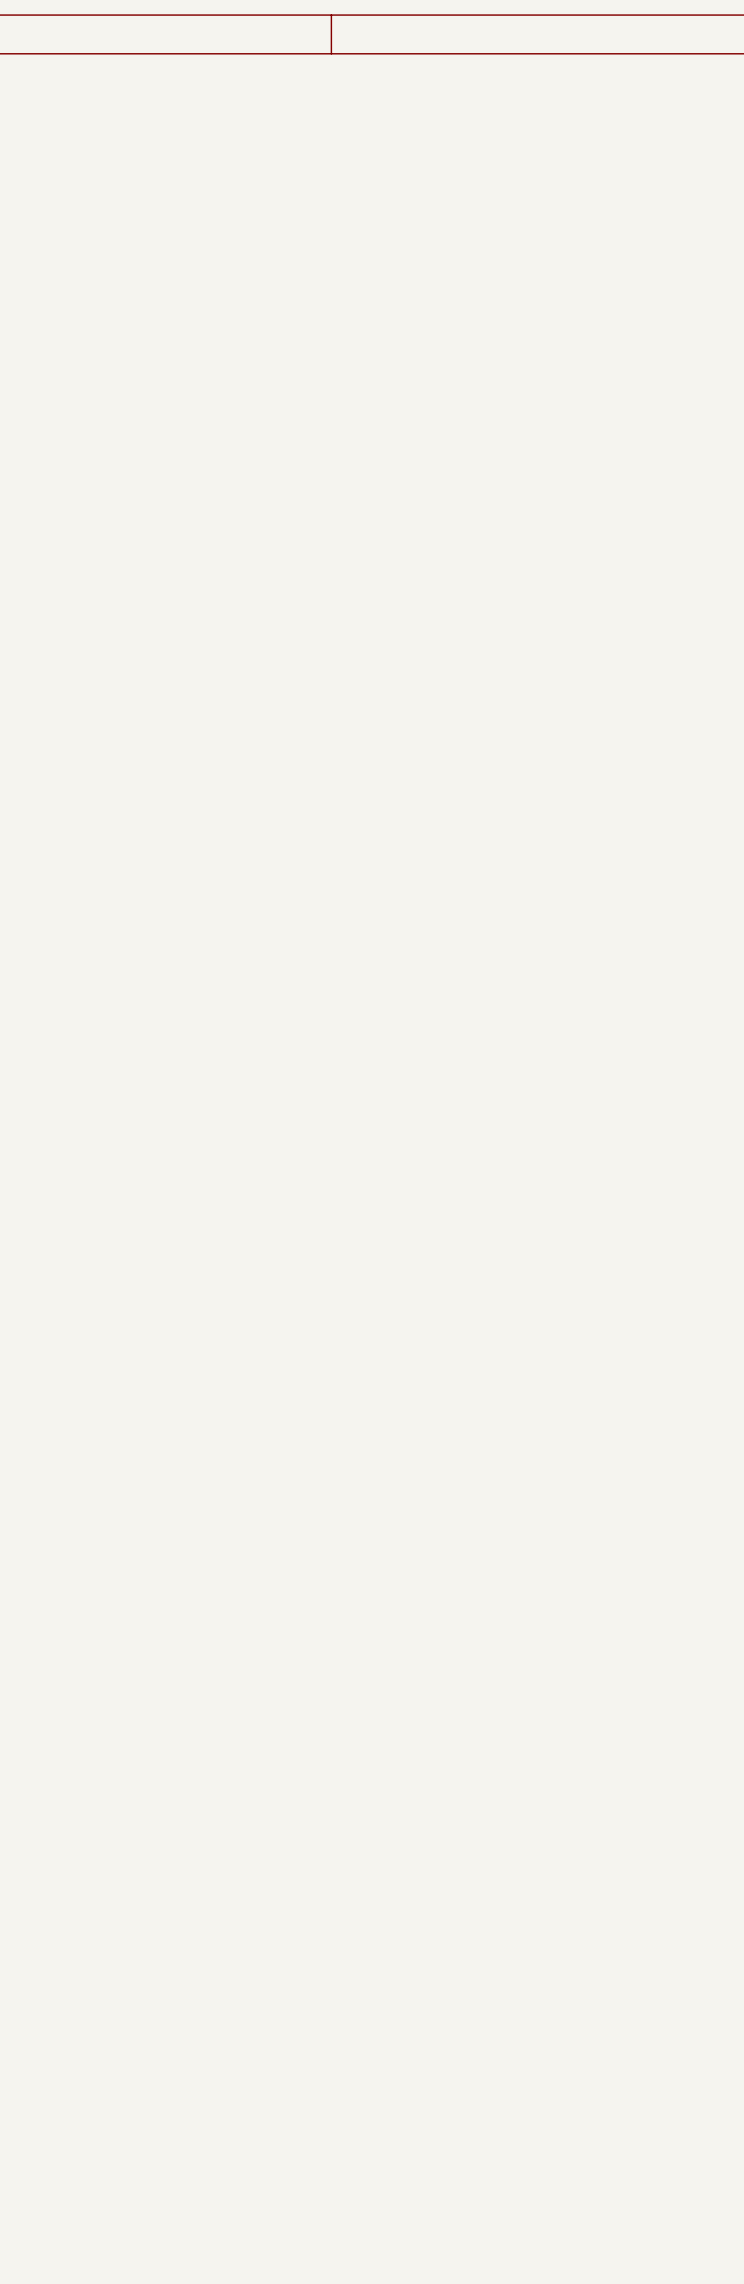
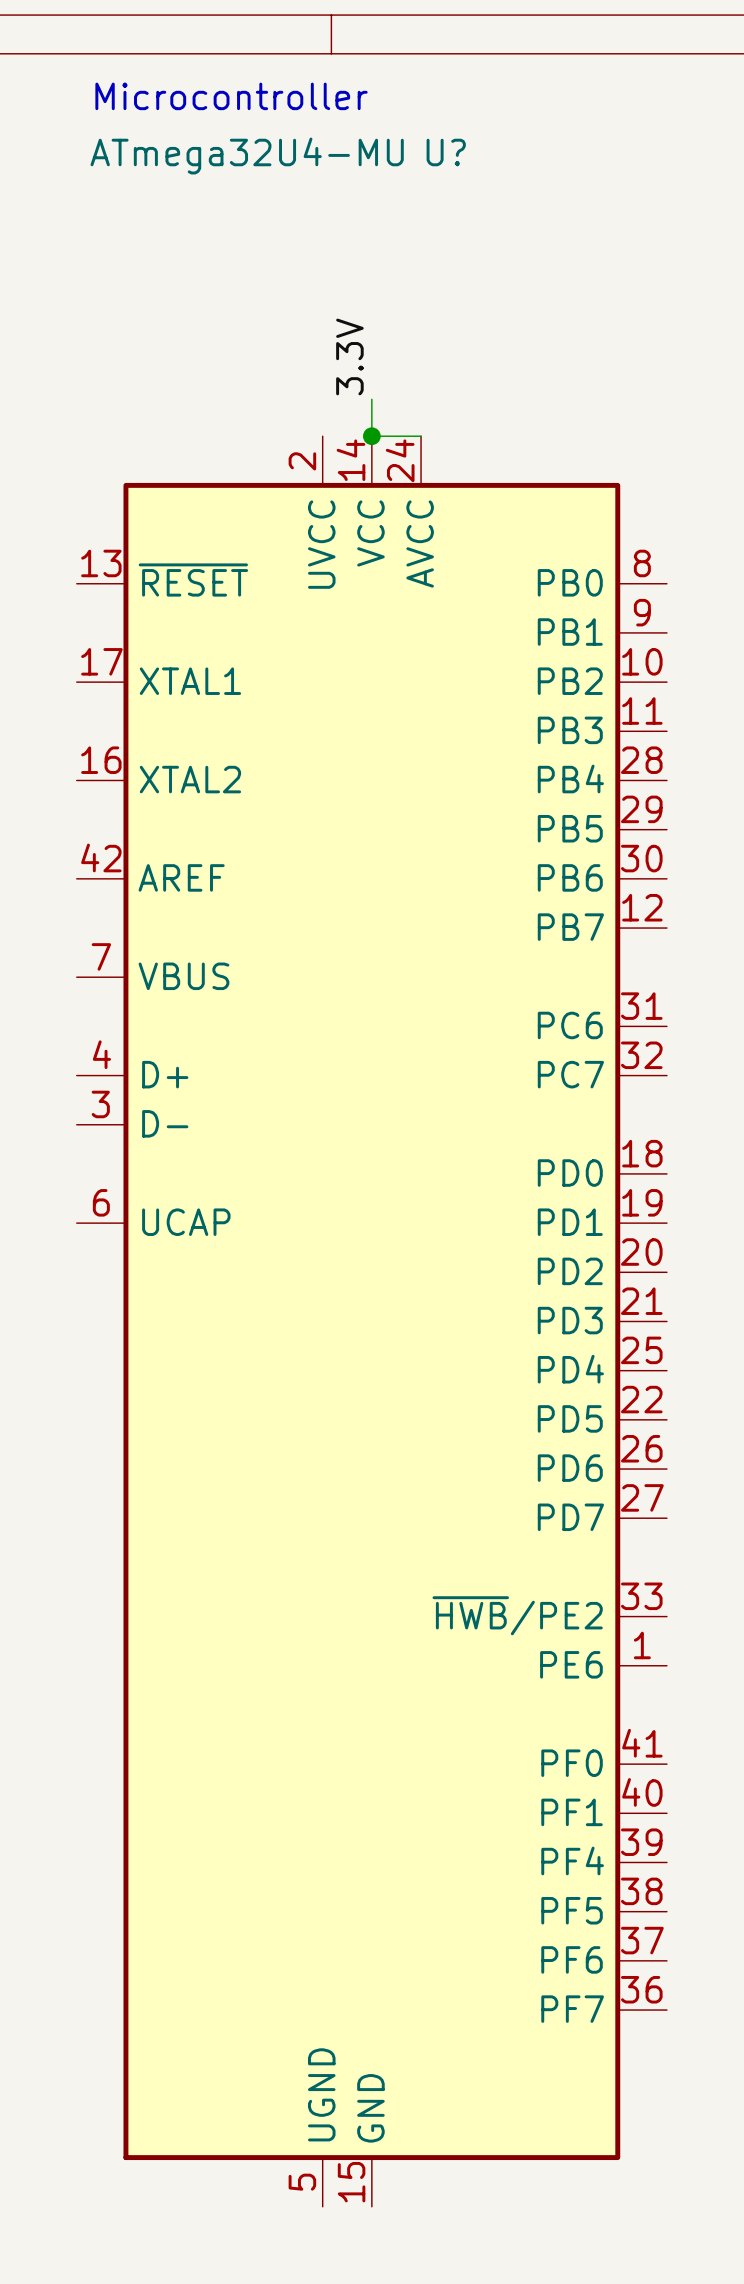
text: none -> Microcontroller (231, 96)
label: none -> 3.3V (349, 356)
wire: none -> (371, 399) (371, 436) (421, 436)
junction: none -> (371, 436)
U?: none -> ATmega32U4-MU (371, 1321)

